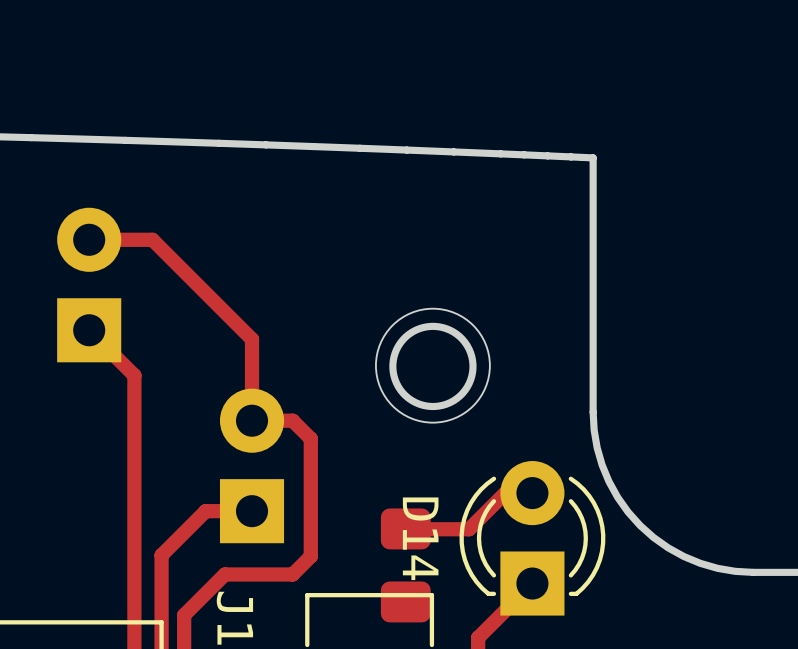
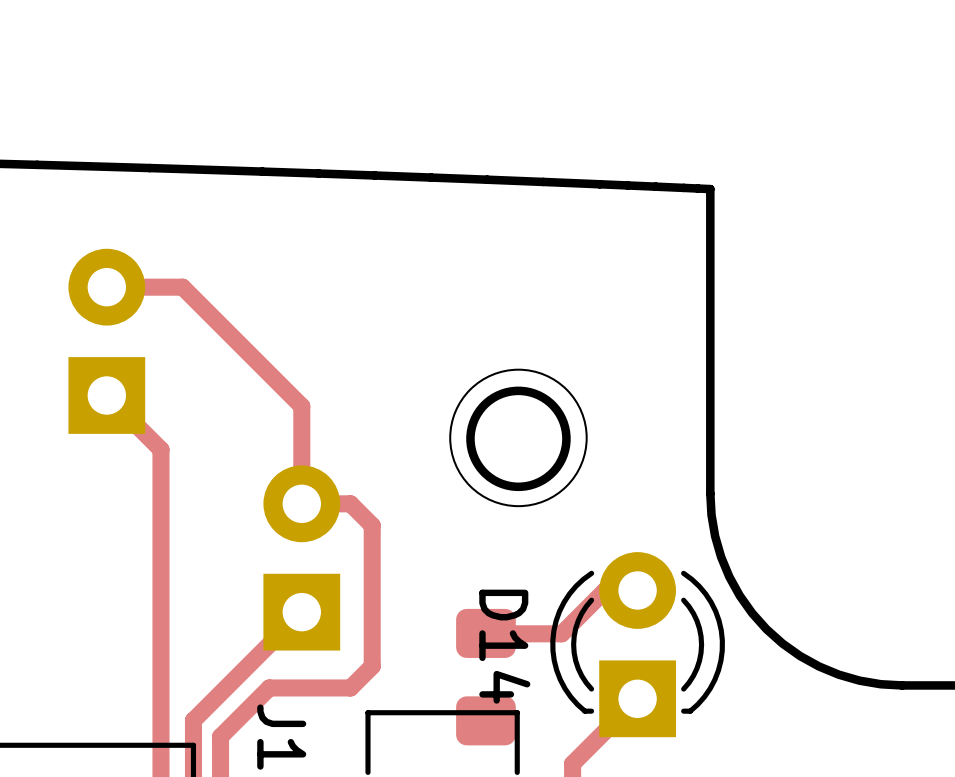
top track: (252, 511) (205, 511) (161, 555) (161, 601) -> (301, 612) (193, 720)

